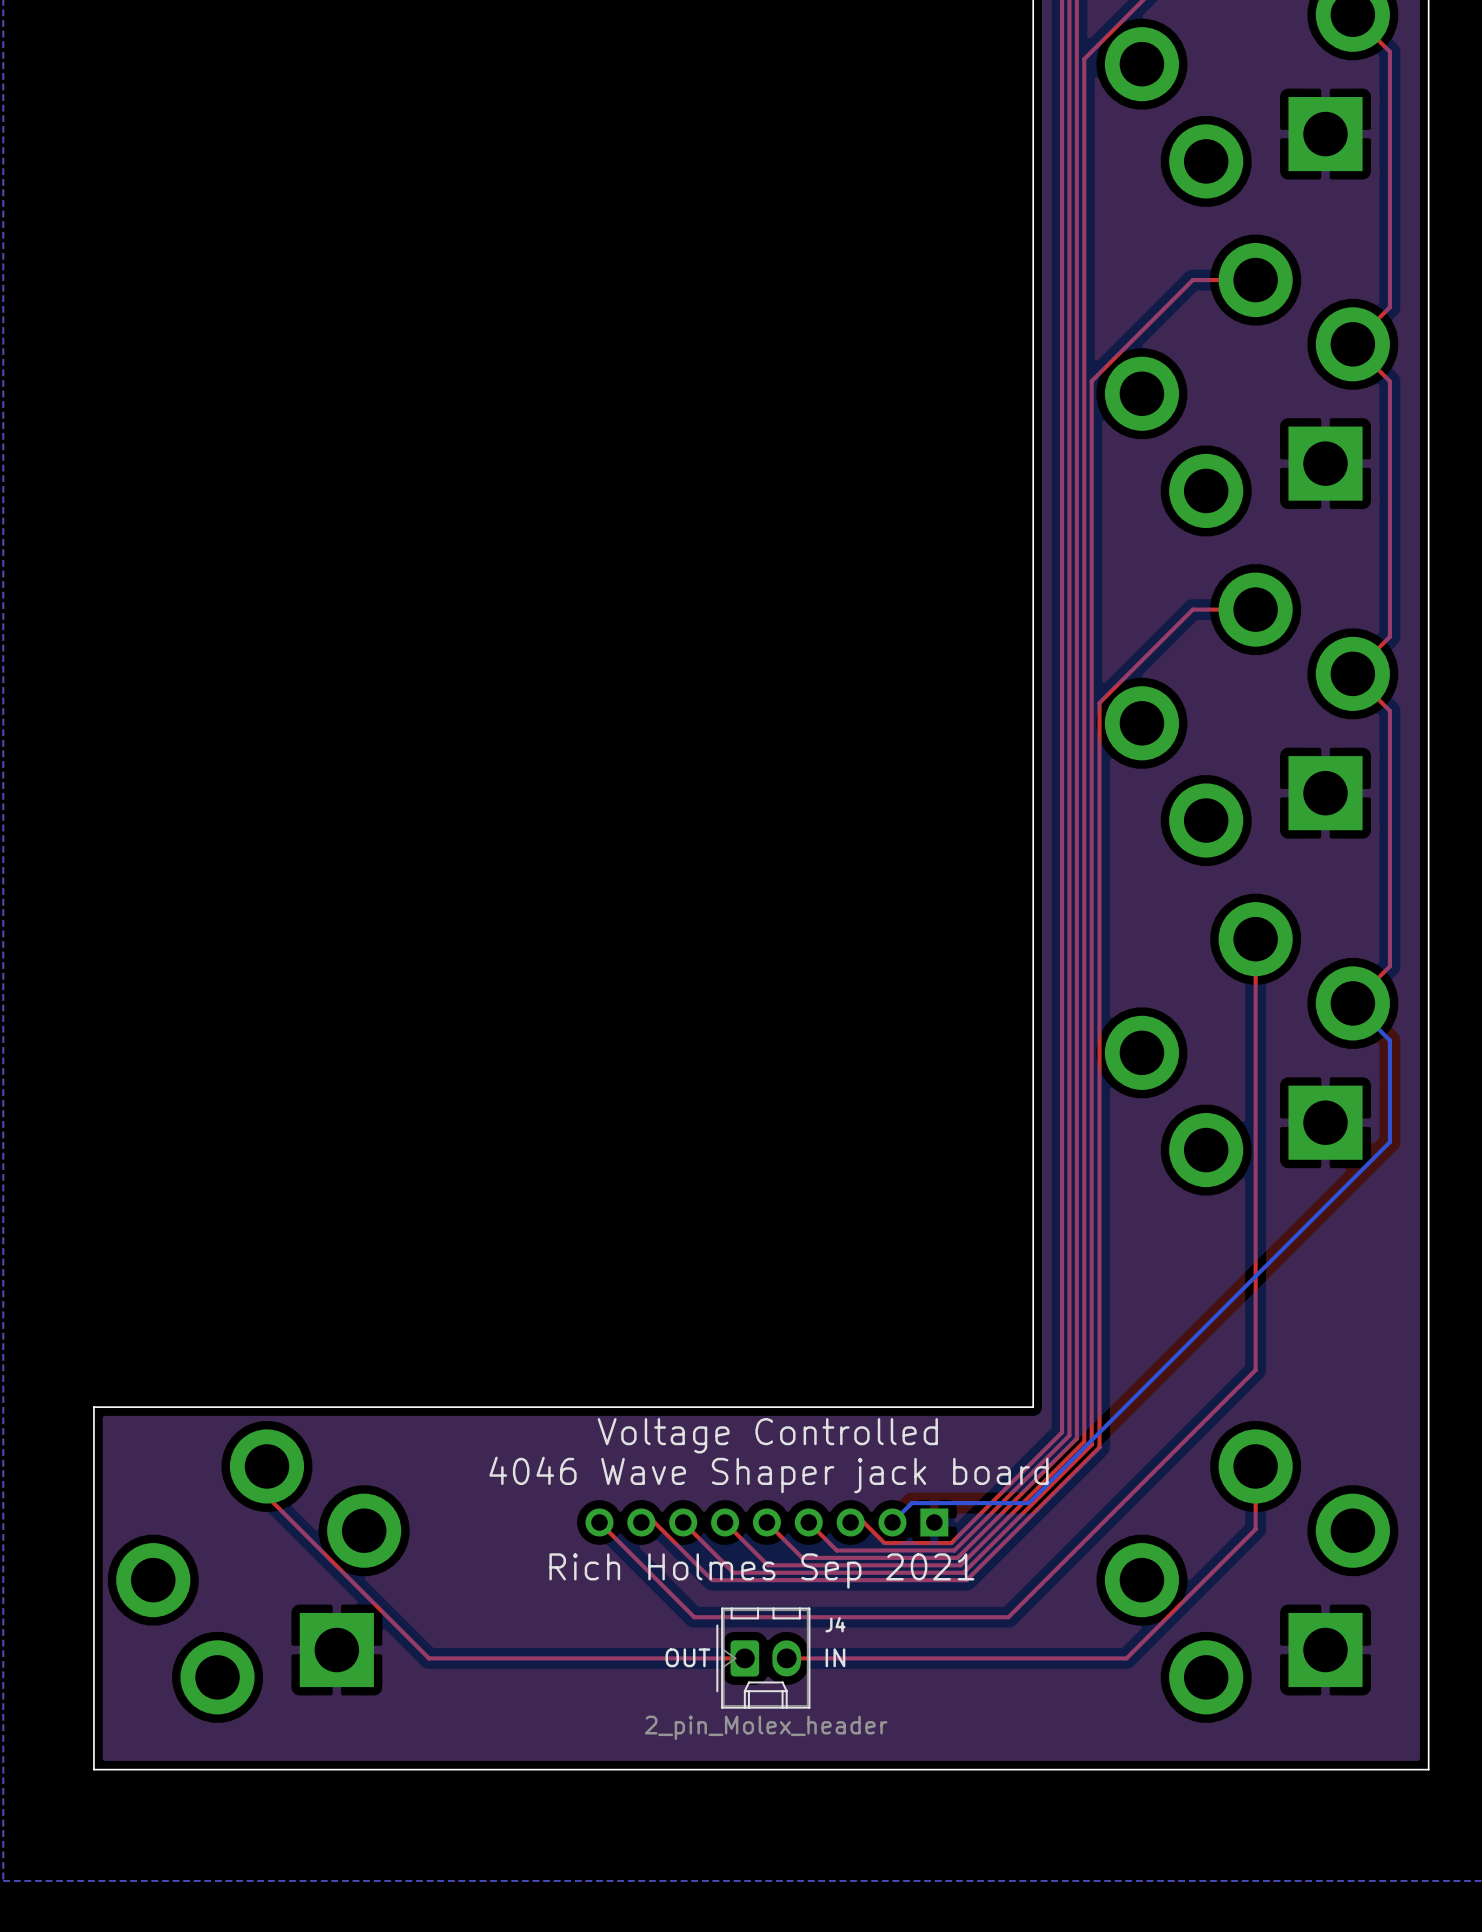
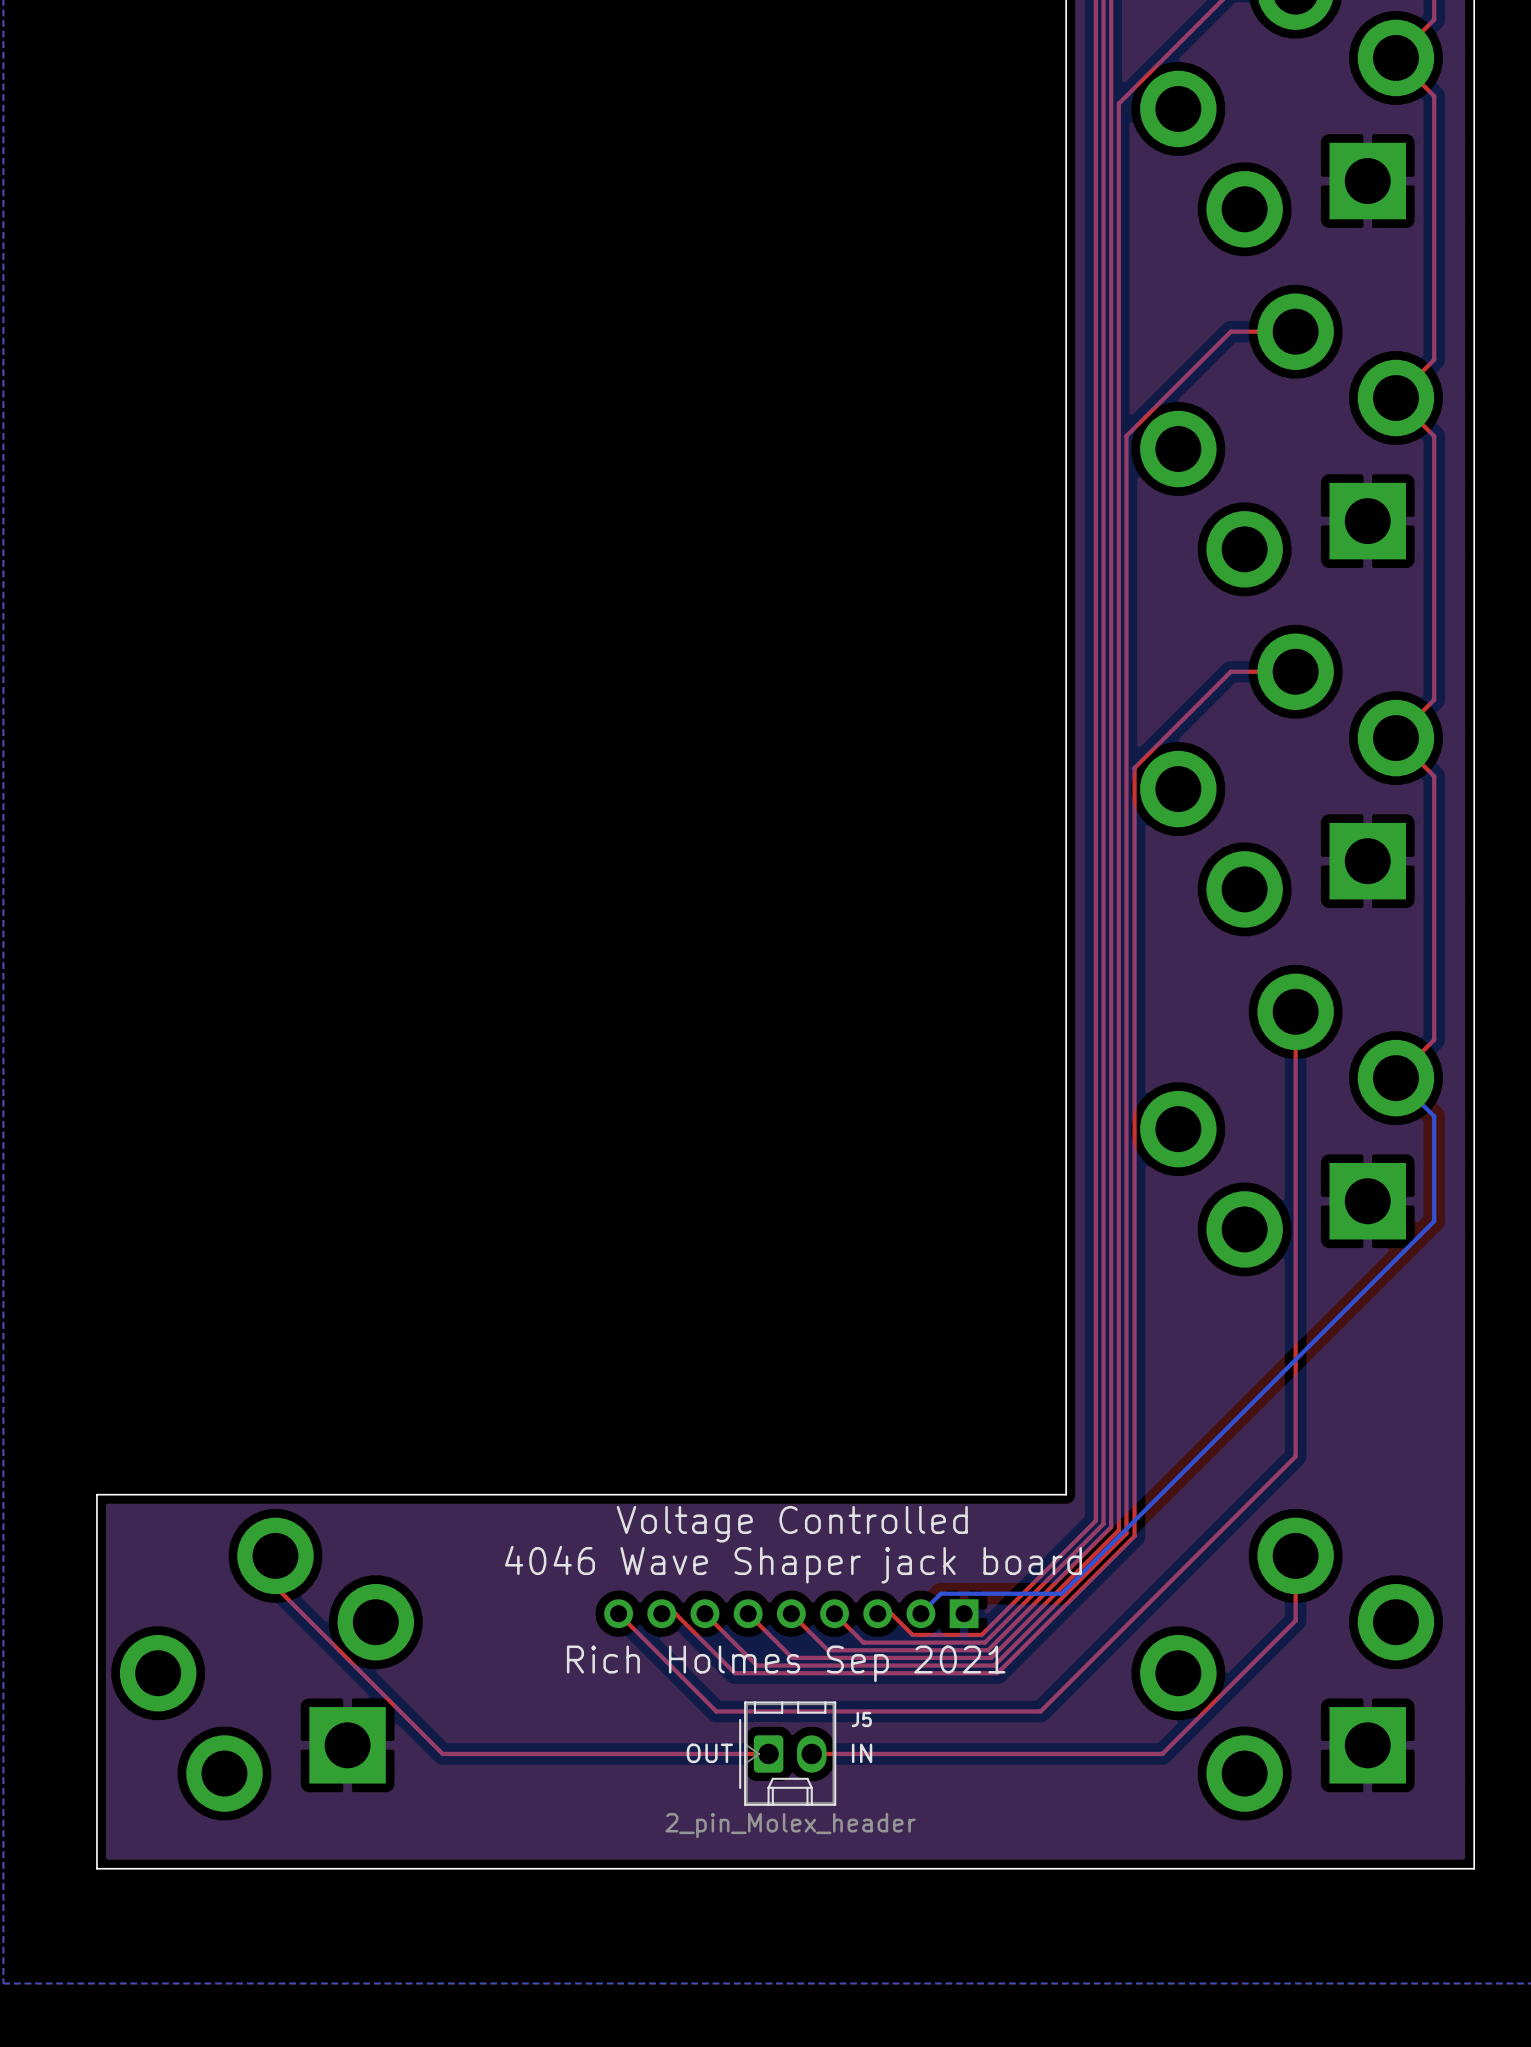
J4 name: J4 (835, 1624) -> J5 (861, 1719)

